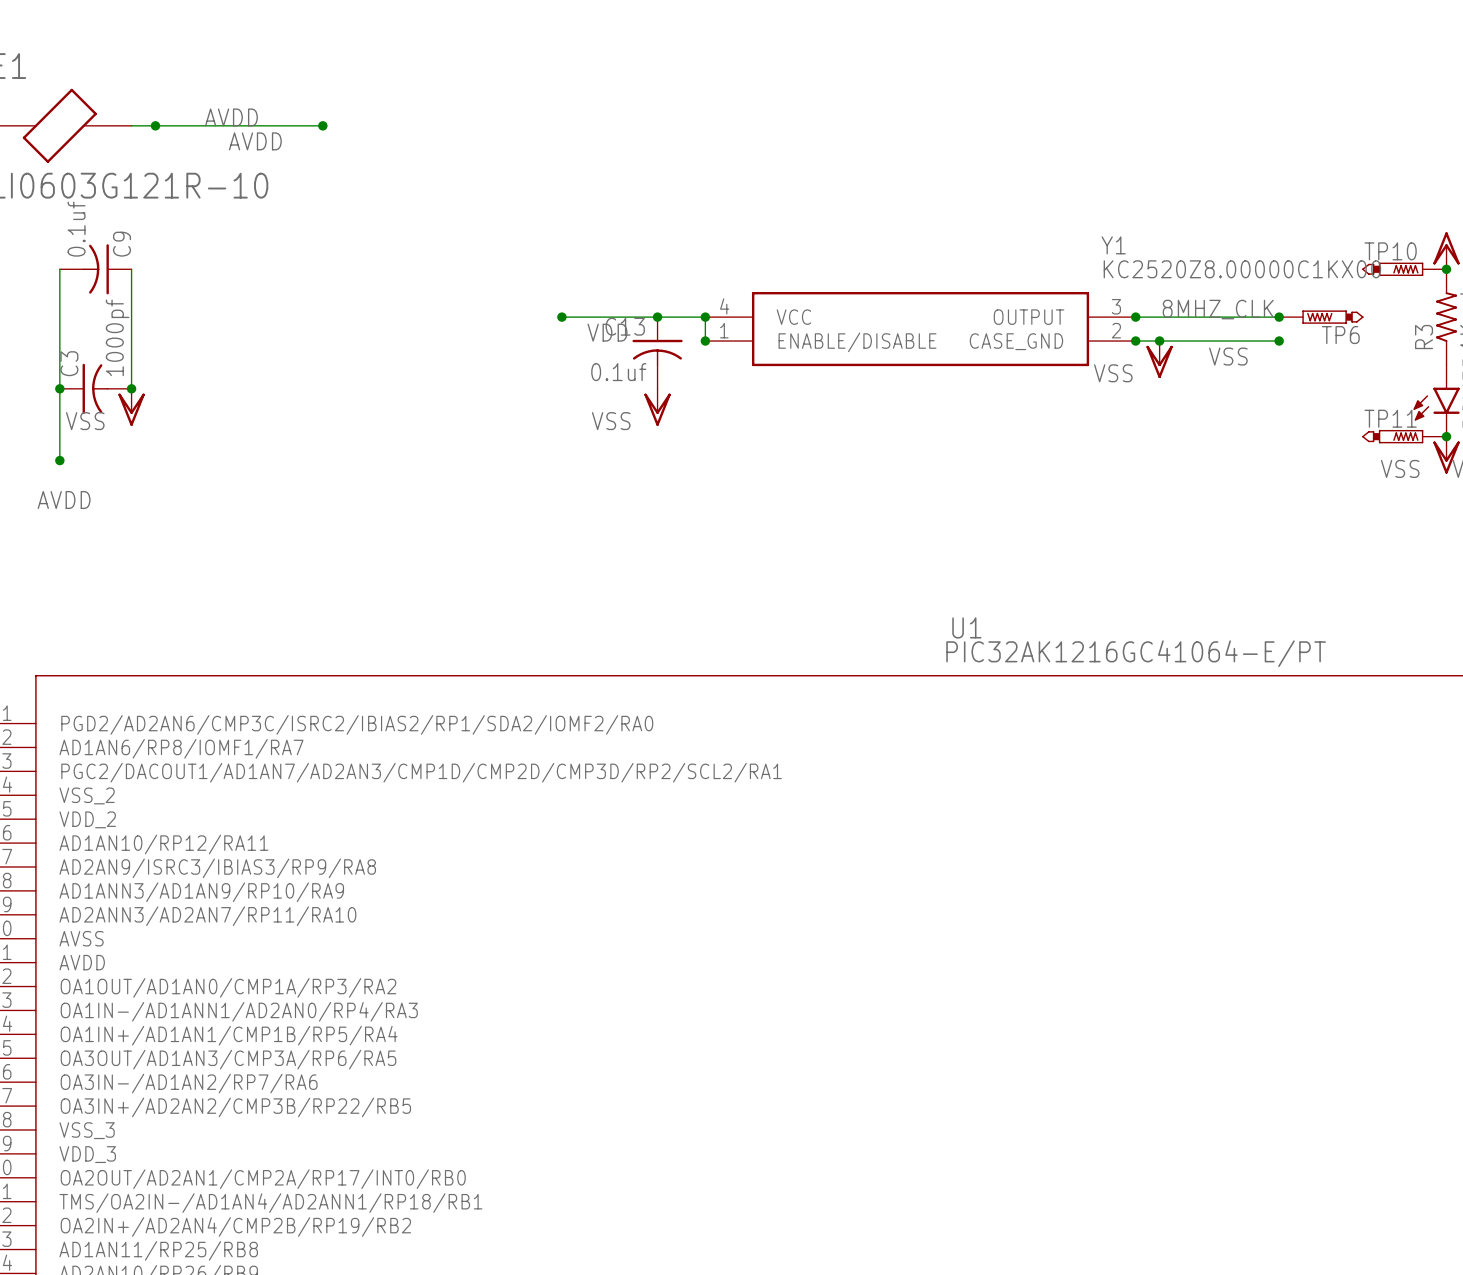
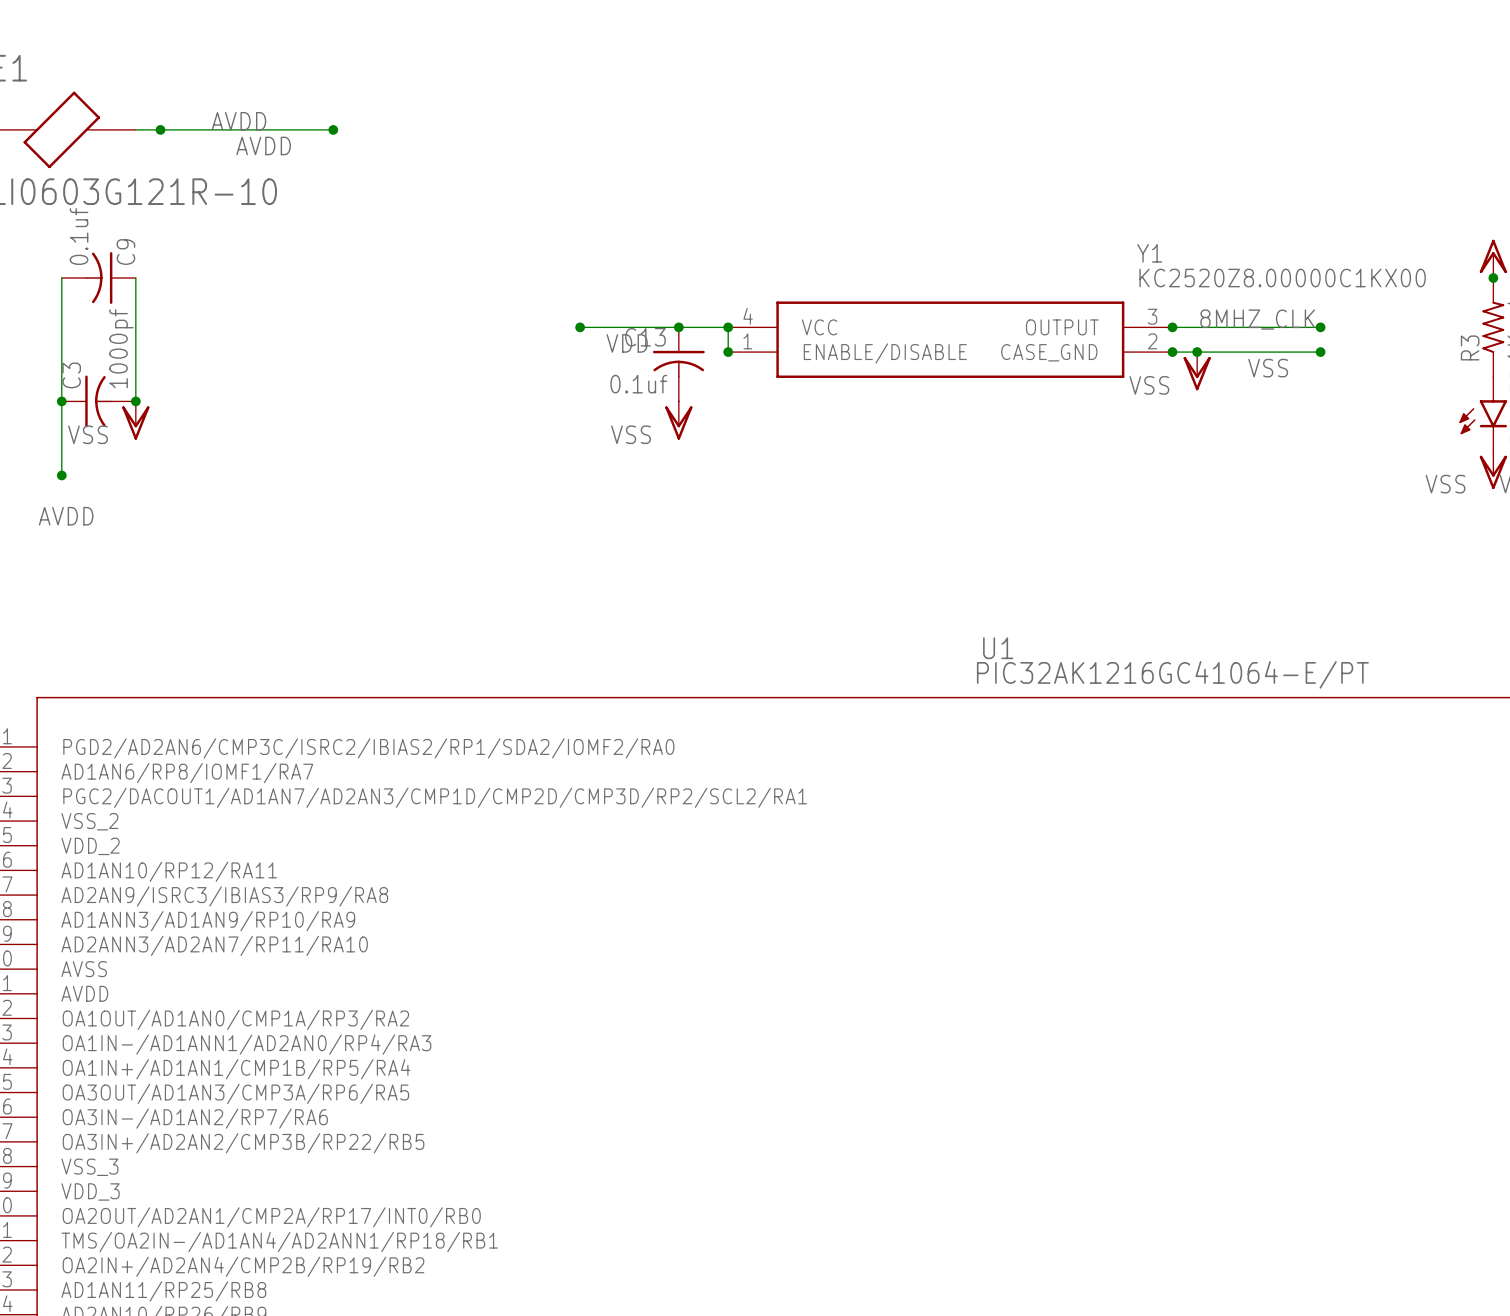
TP10: (1404, 269) -> none
TP6: (1321, 317) -> none
TP11: (1404, 436) -> none
junction: (1446, 436) -> none

